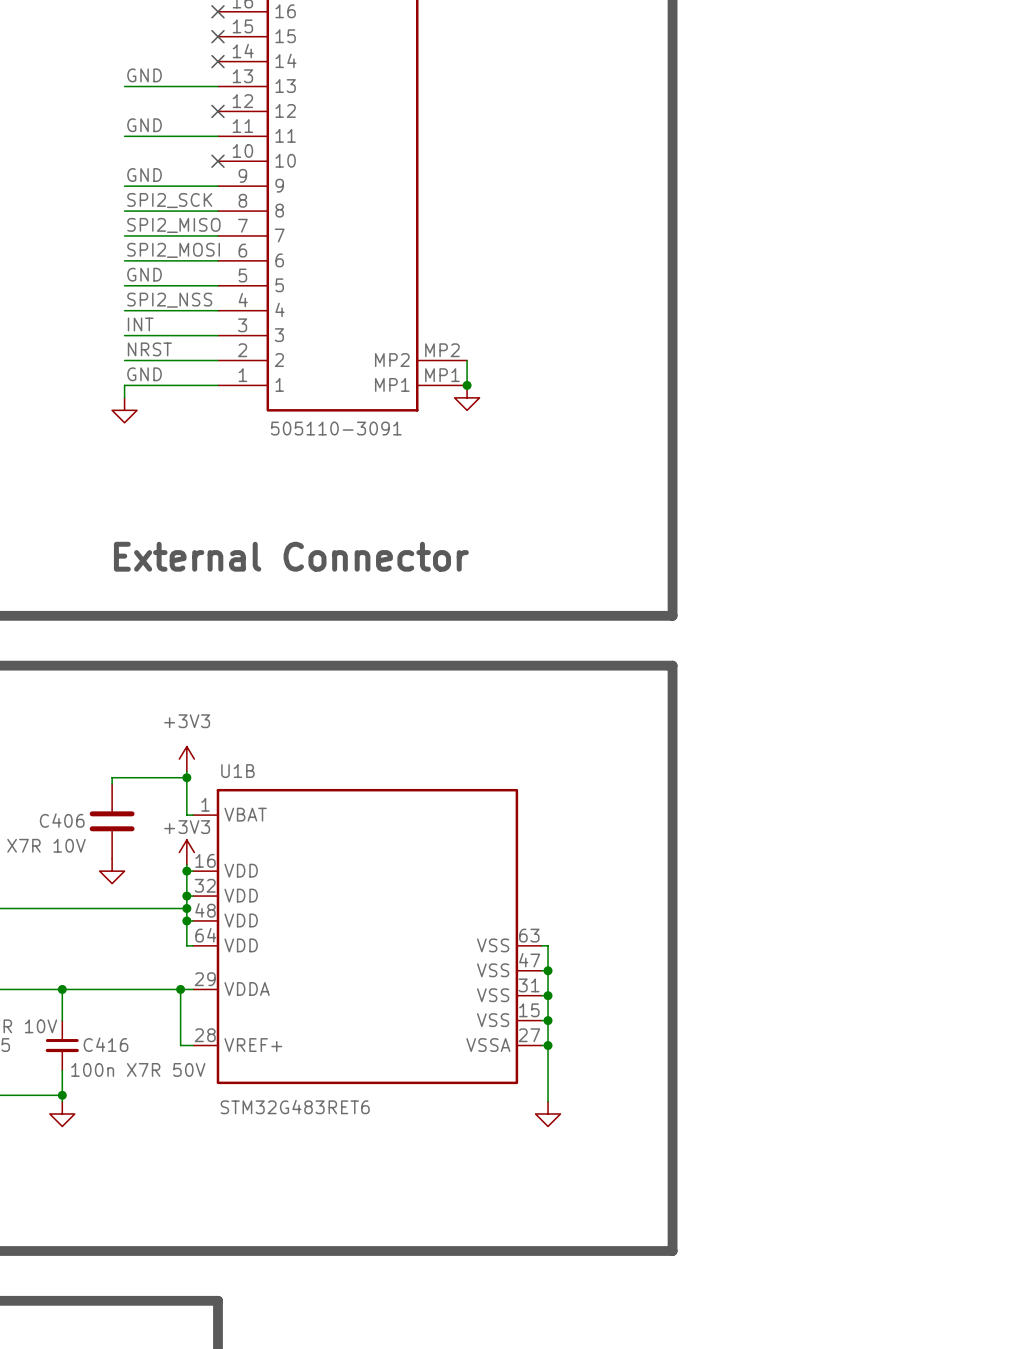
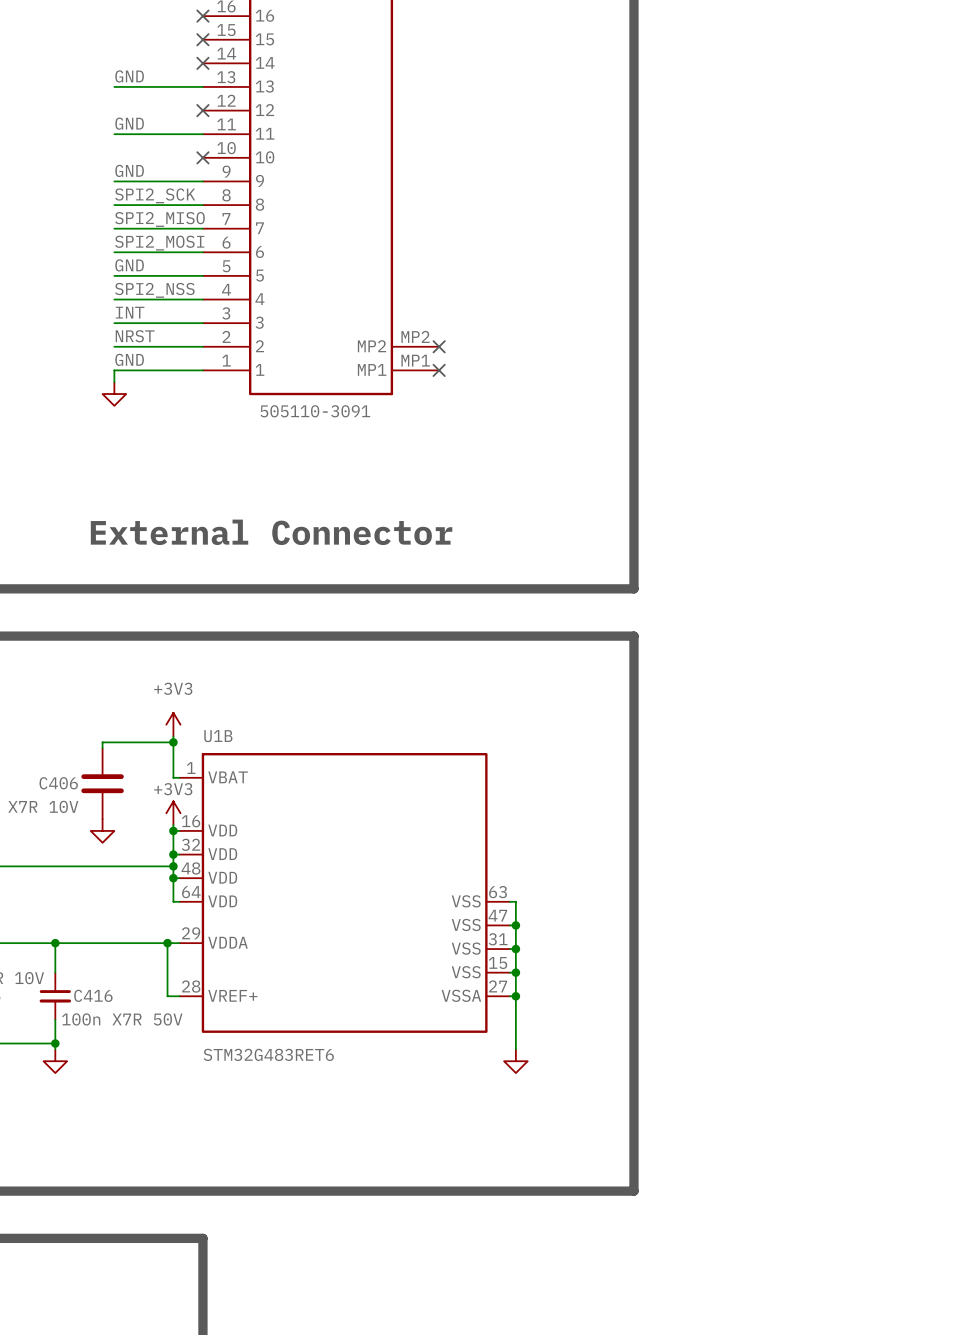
wire: (467, 360) (467, 385) -> none
no-connect mark: none -> (439, 346)
junction: (467, 385) -> none
no-connect mark: none -> (439, 370)
power symbol: (467, 397) -> none

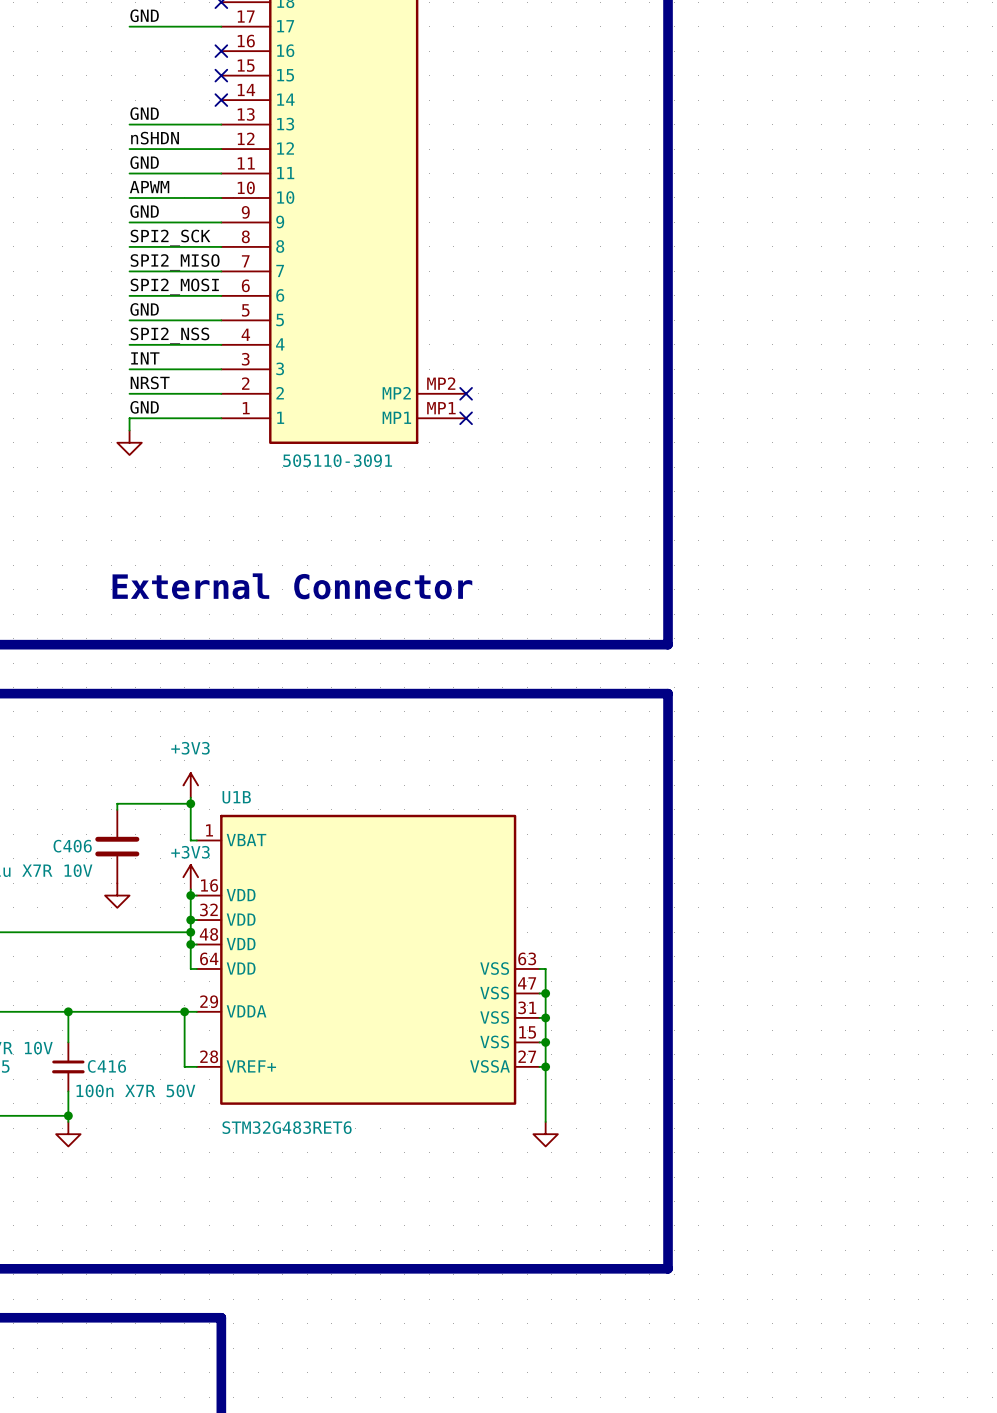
label: none -> nSHDN (155, 138)
wire: none -> (129, 149) (221, 149)
no-connect mark: (202, 110) -> none
label: none -> APWM (149, 187)
wire: none -> (129, 197) (221, 197)
no-connect mark: (202, 157) -> none

